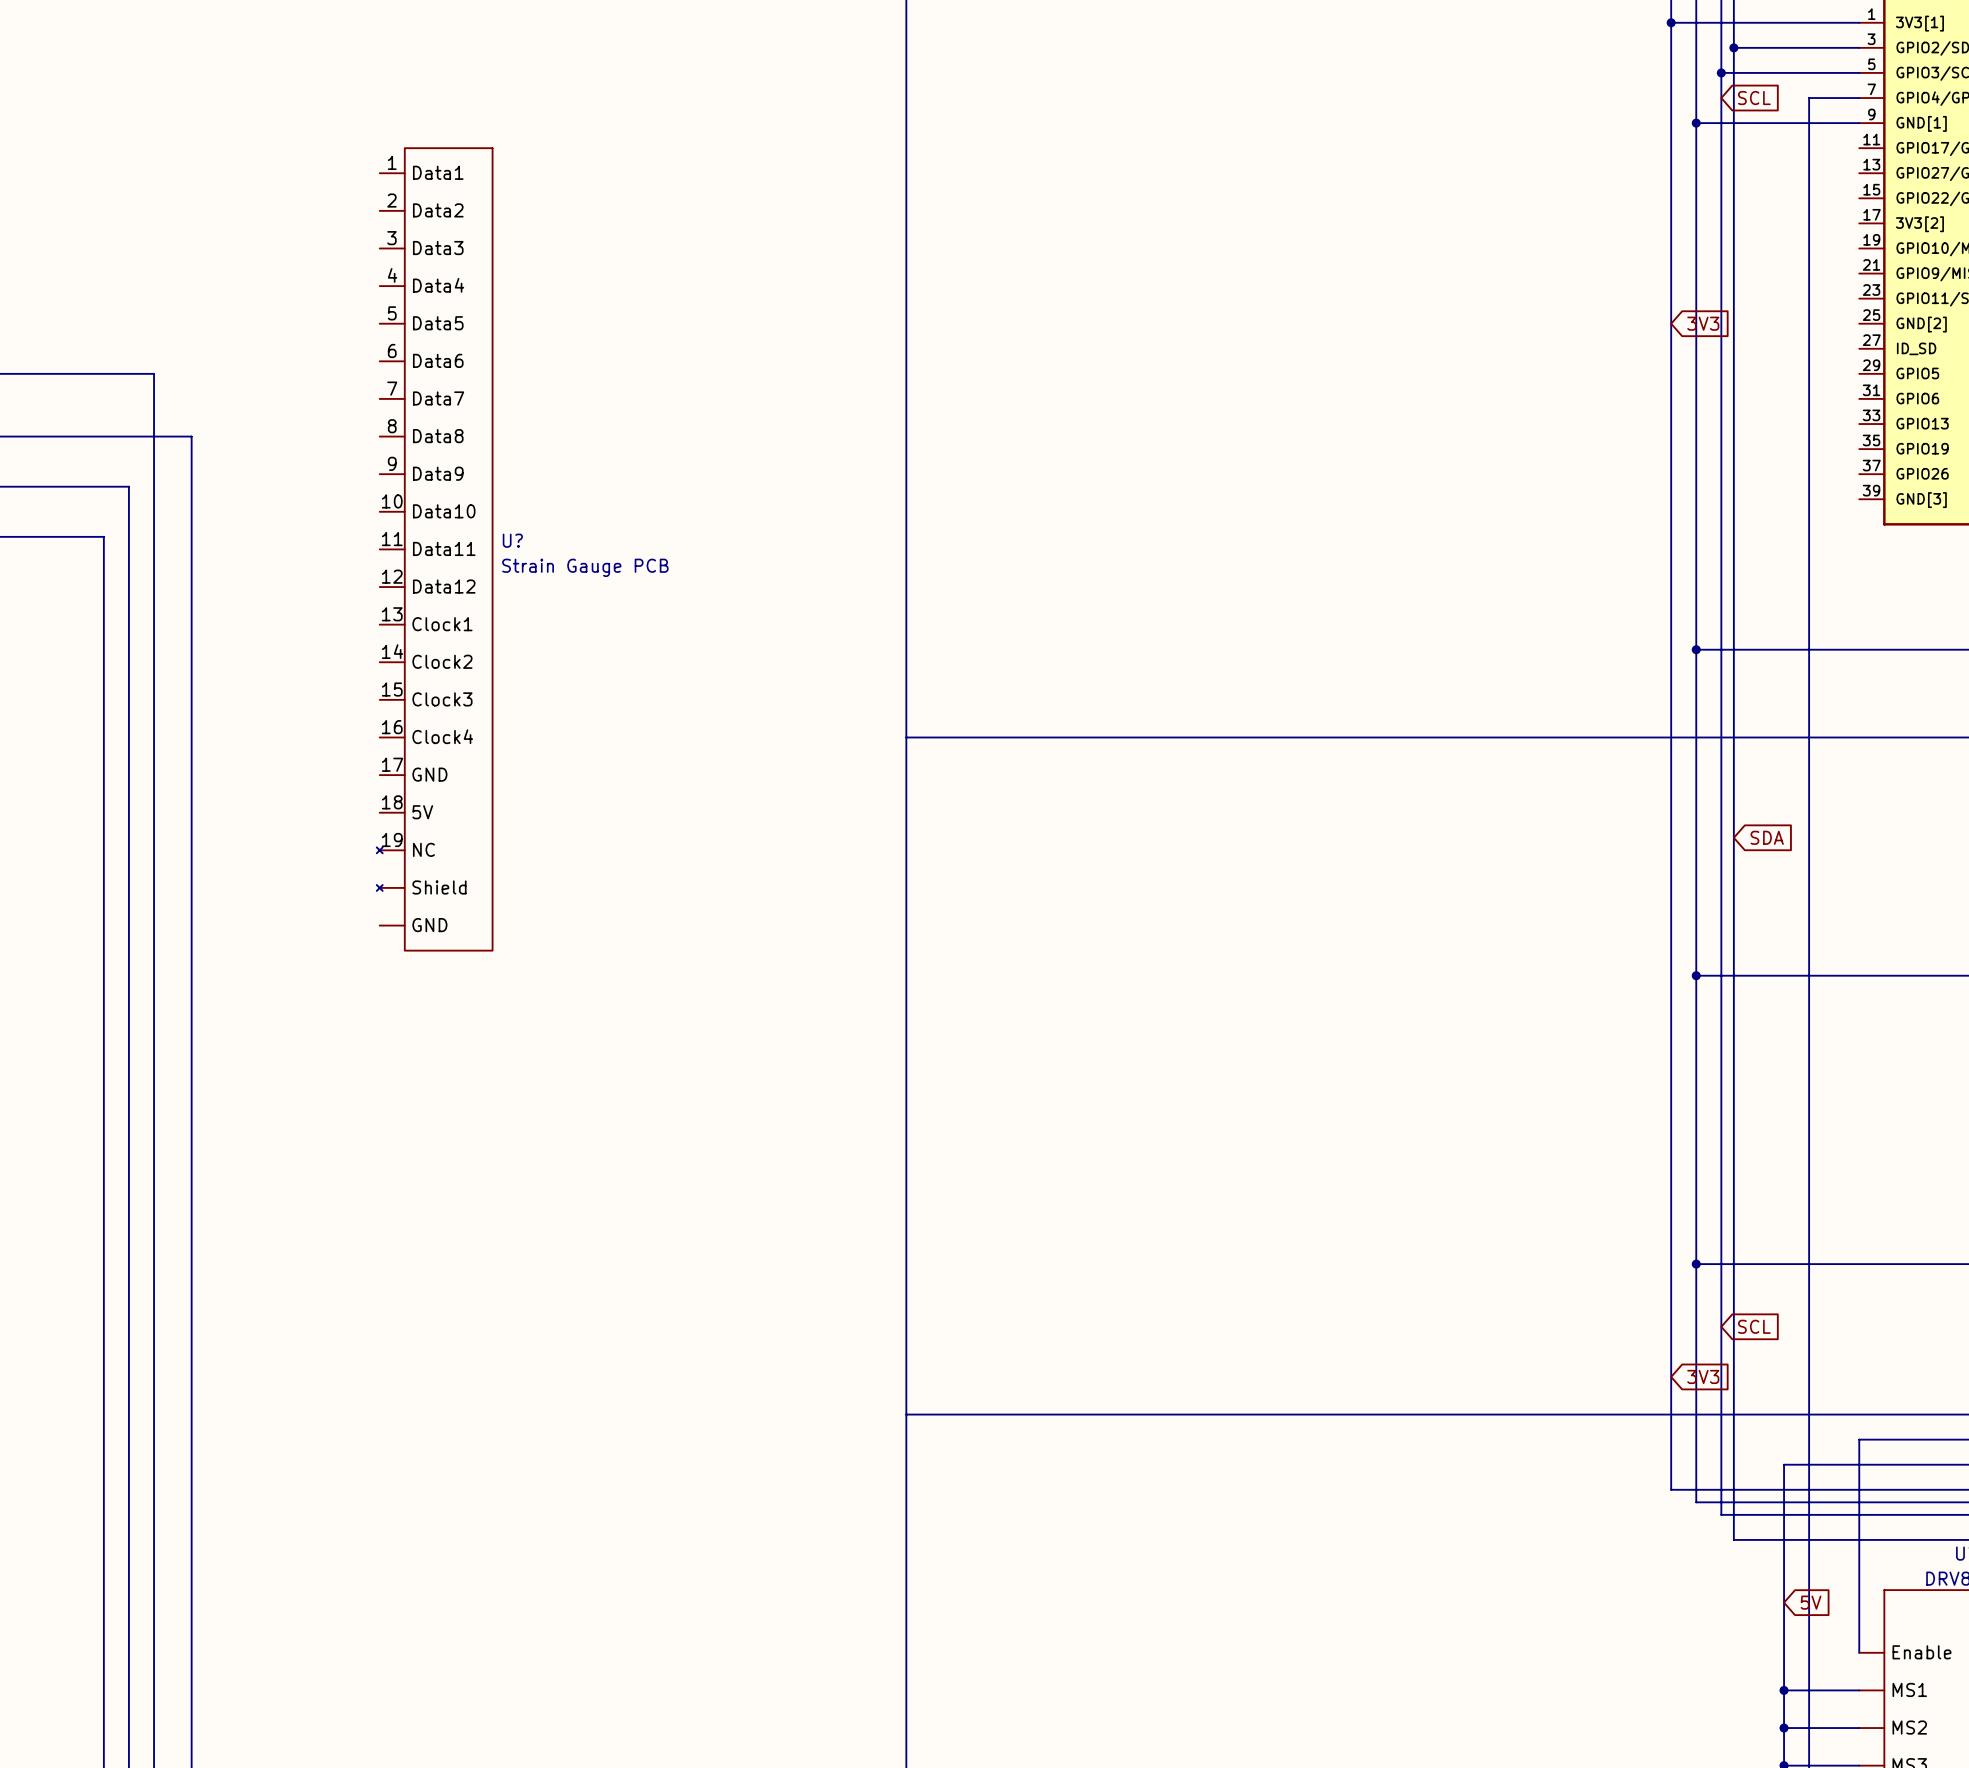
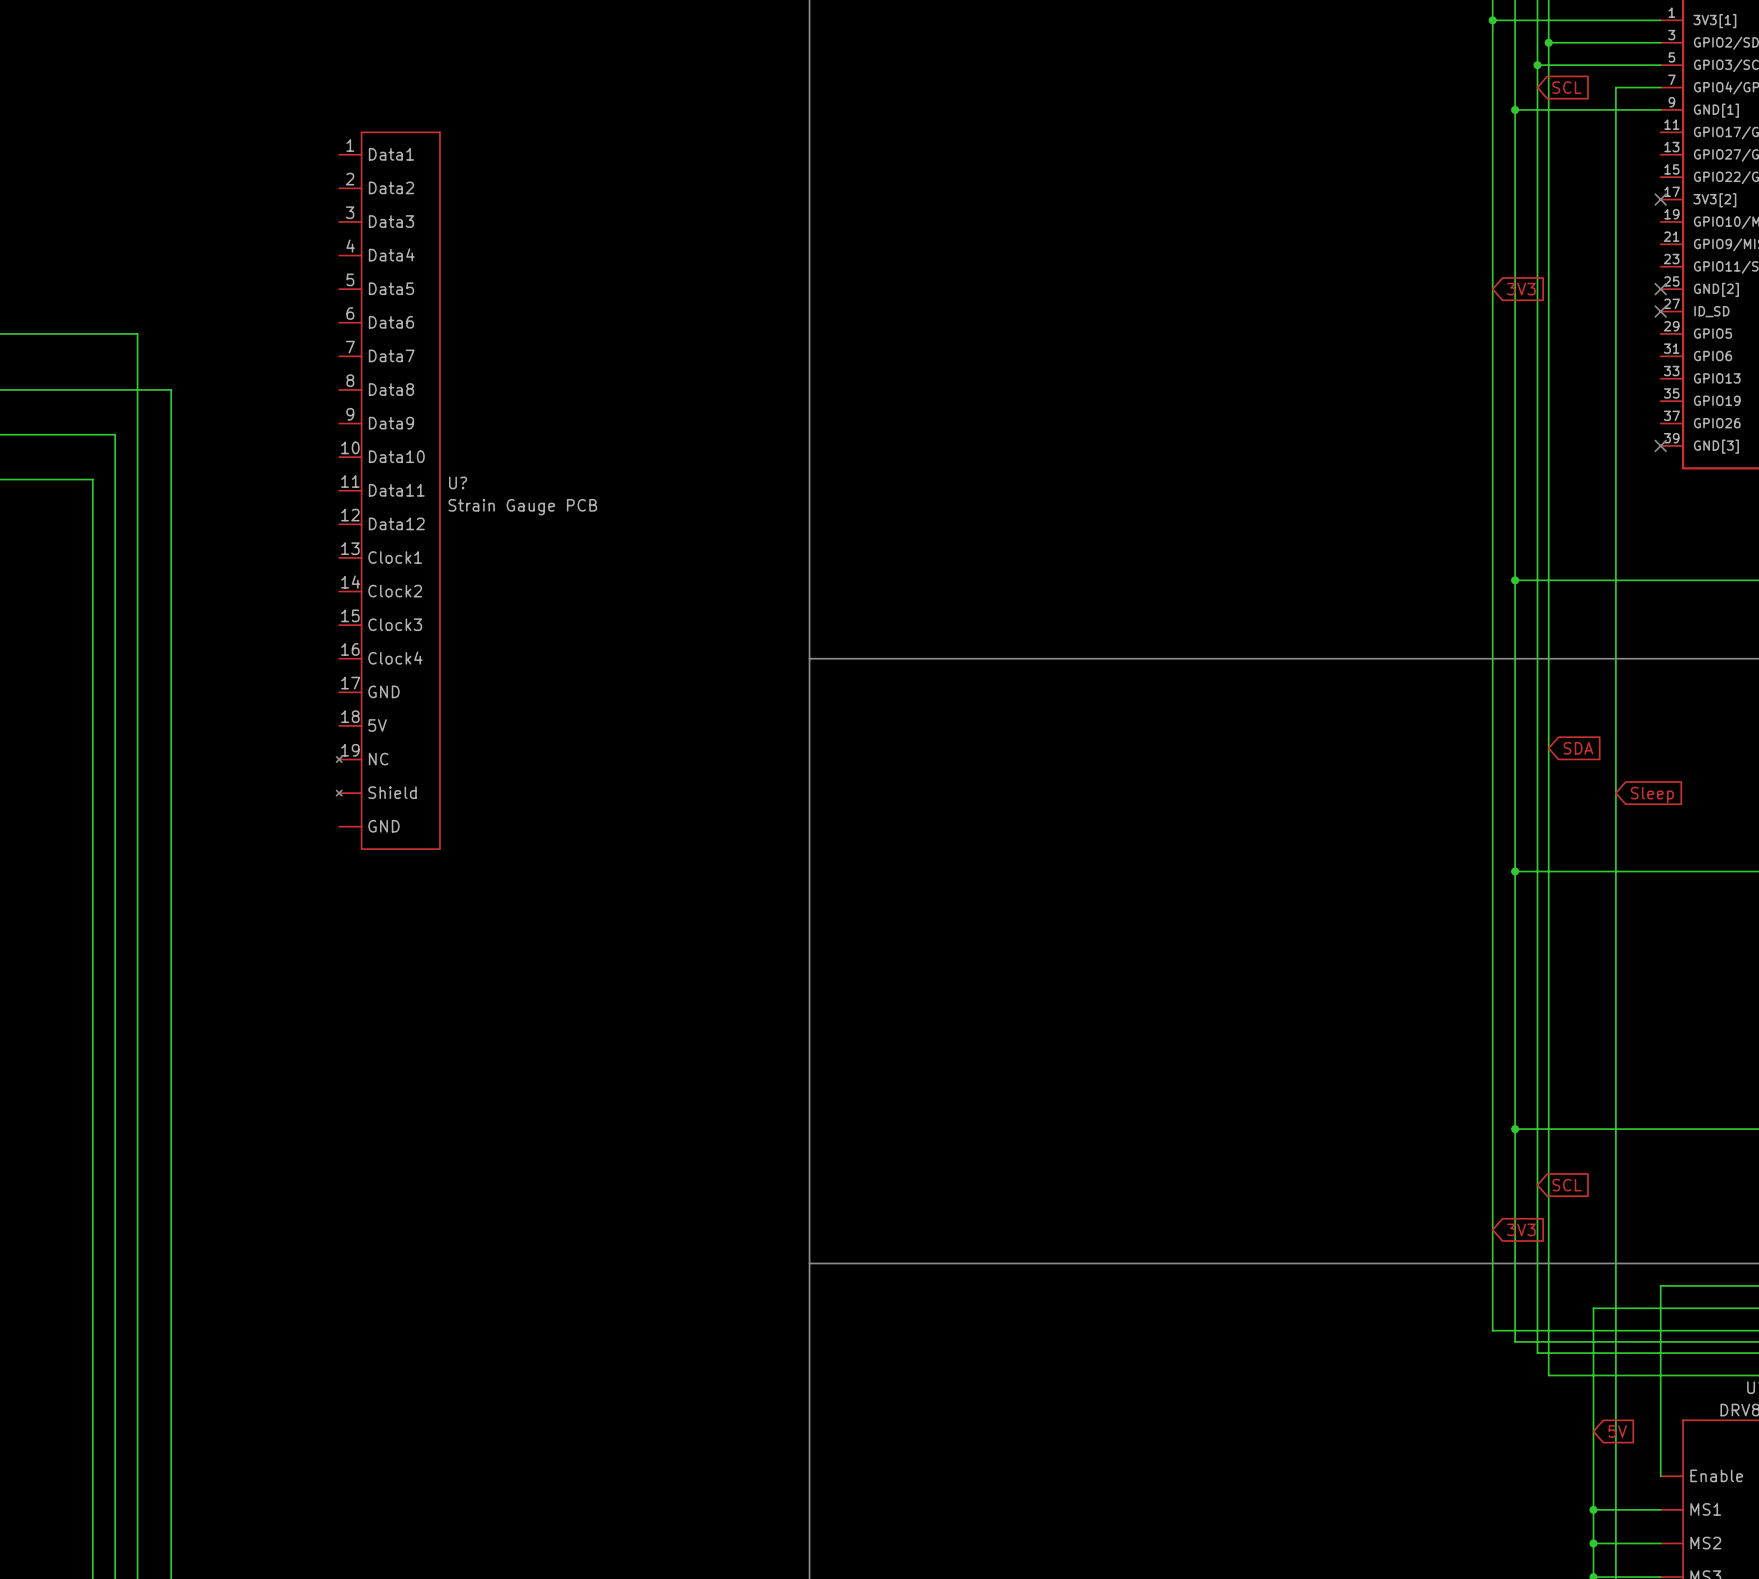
no-connect mark: none -> (1660, 199)
no-connect mark: none -> (1660, 289)
no-connect mark: none -> (1660, 311)
no-connect mark: none -> (1660, 445)
global label: none -> Sleep (1652, 794)

